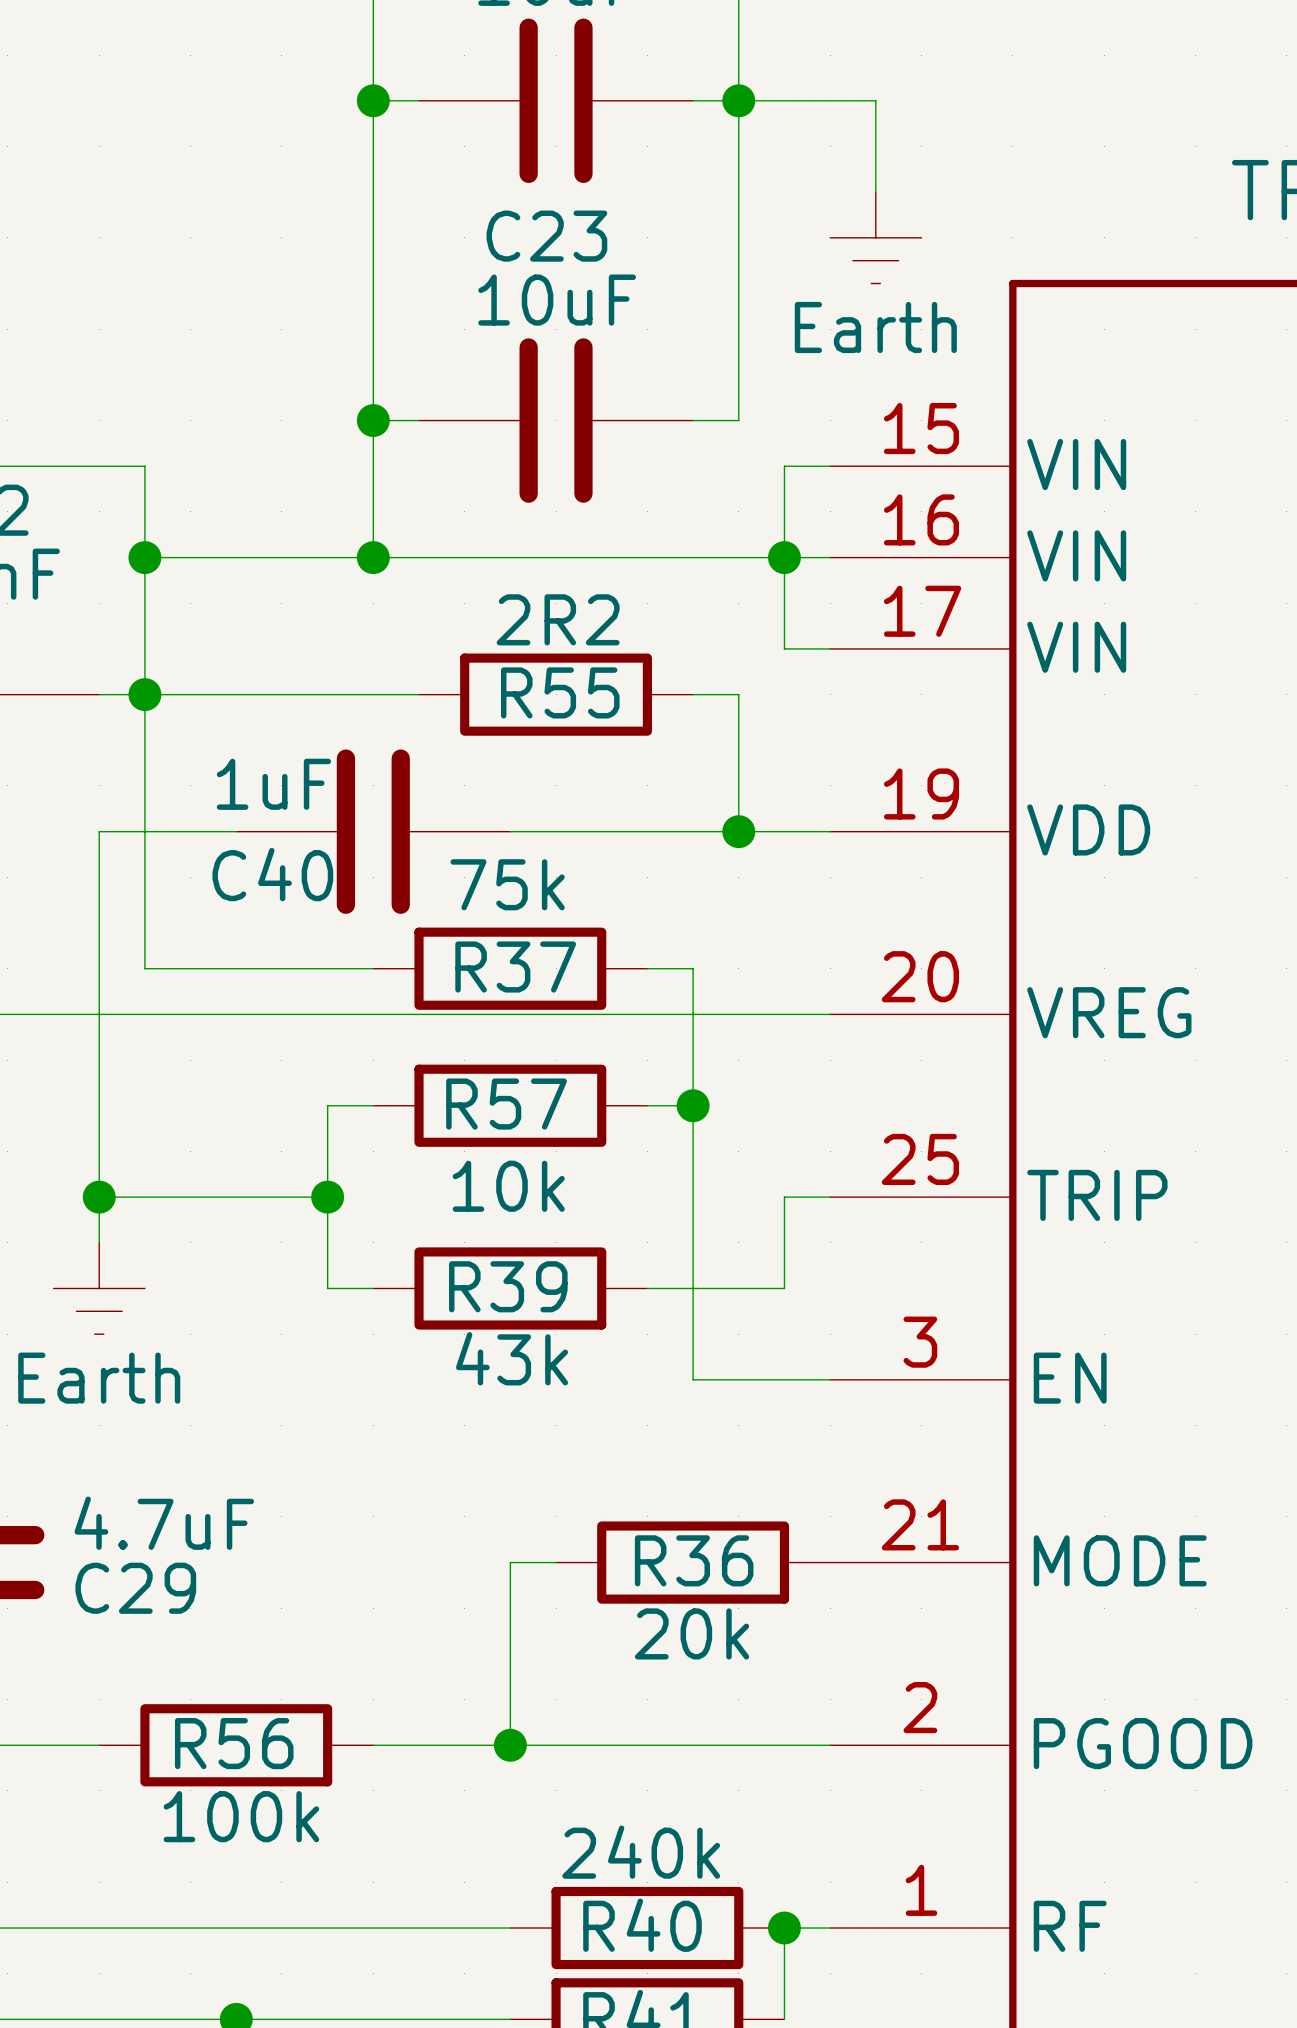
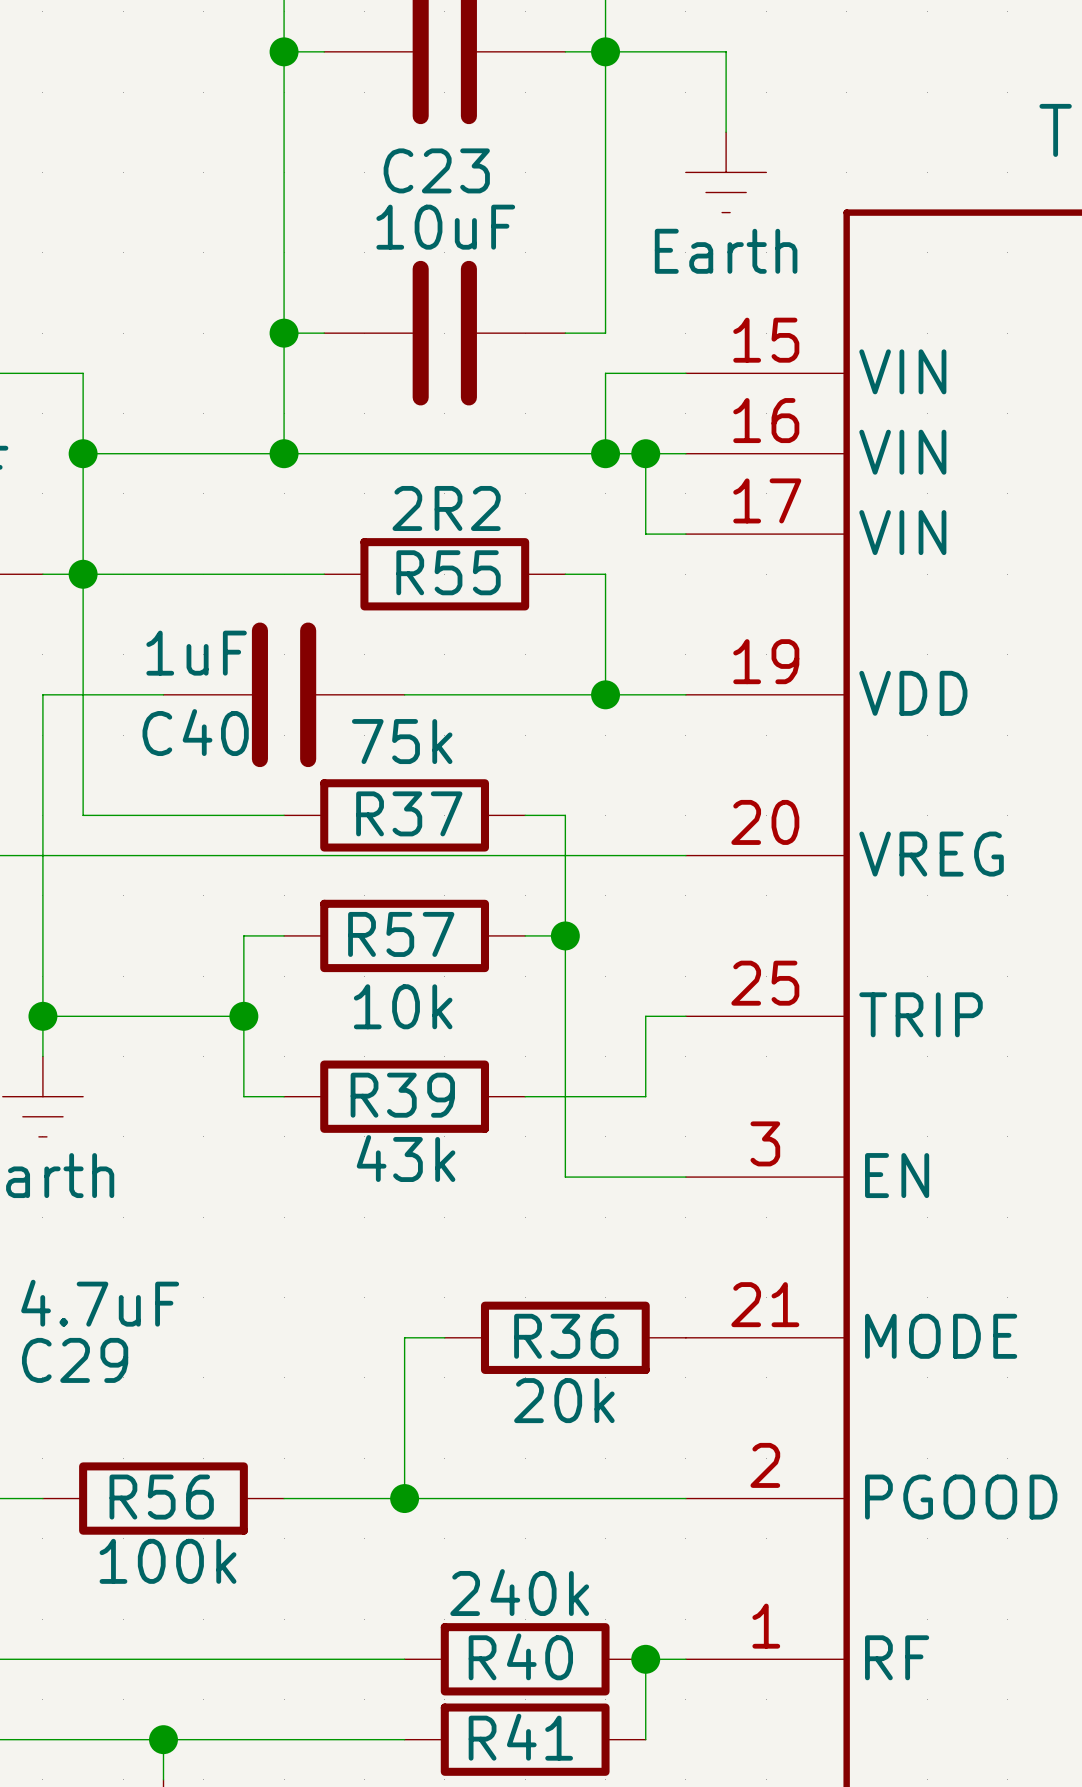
wire: (784, 466) (784, 557) -> (645, 373) (605, 373) (605, 453)
junction: none -> (605, 453)

